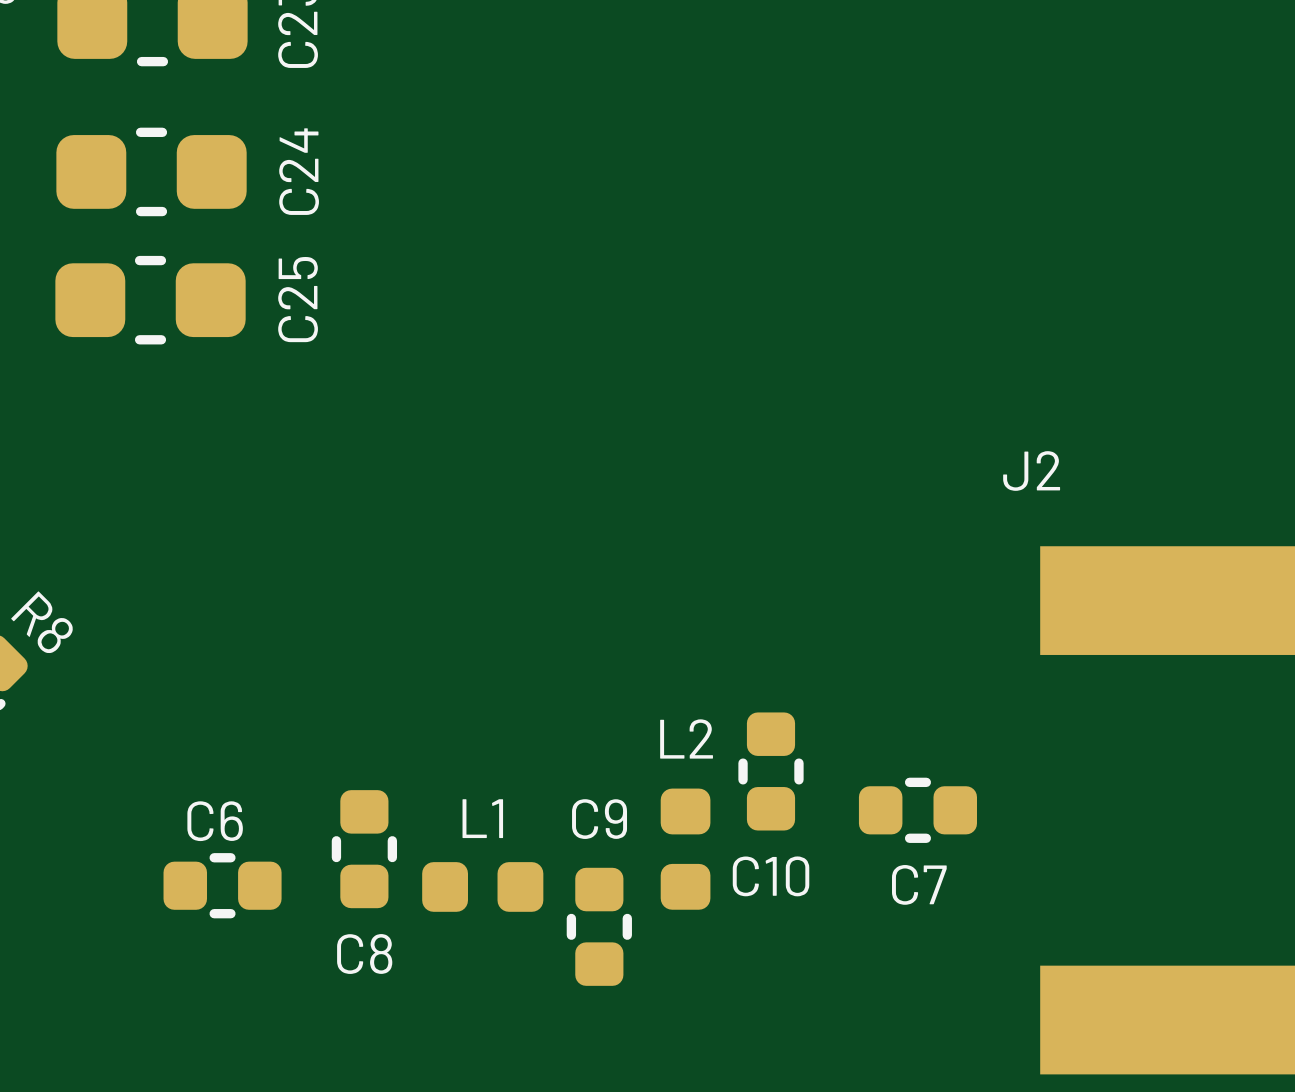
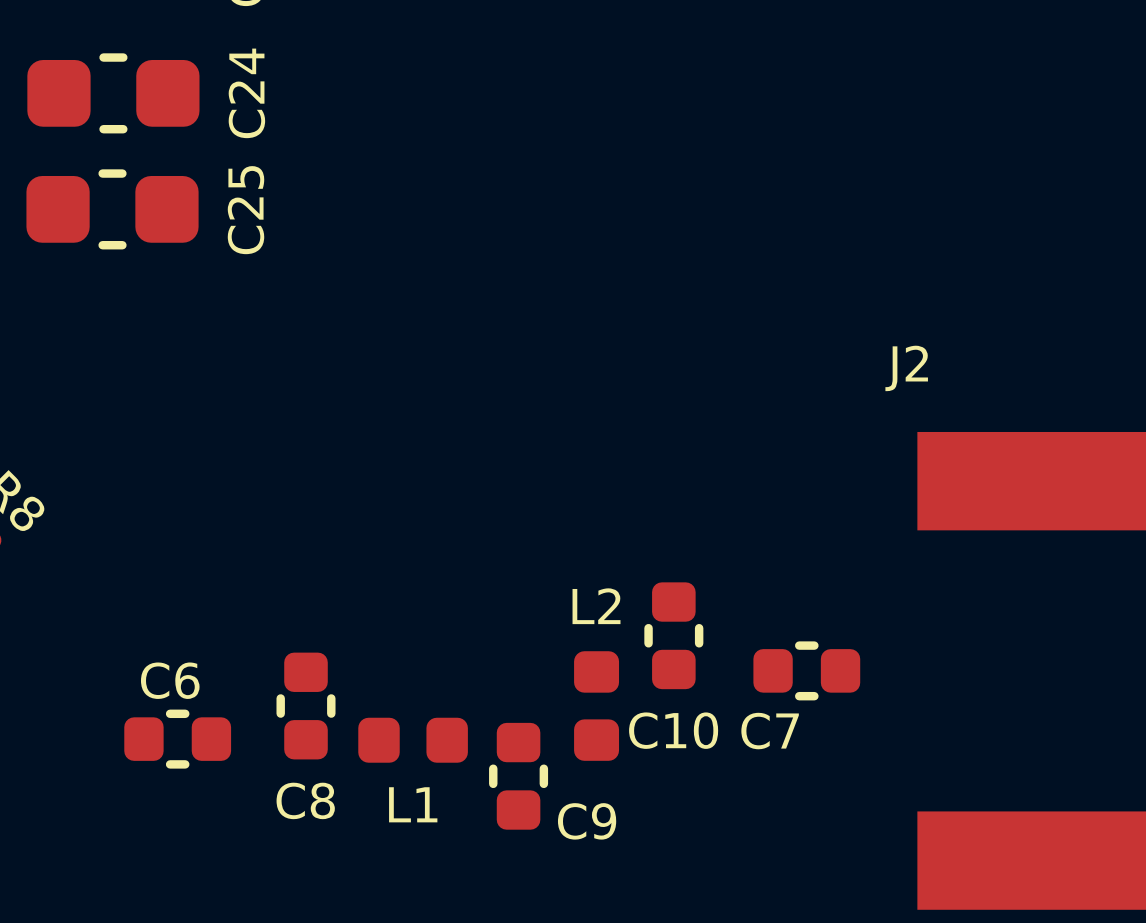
L1 name position: L1 (482, 818) -> L1 (413, 804)
C9 name position: C9 (599, 819) -> C9 (587, 821)
C7 name position: C7 (919, 884) -> C7 (770, 731)

